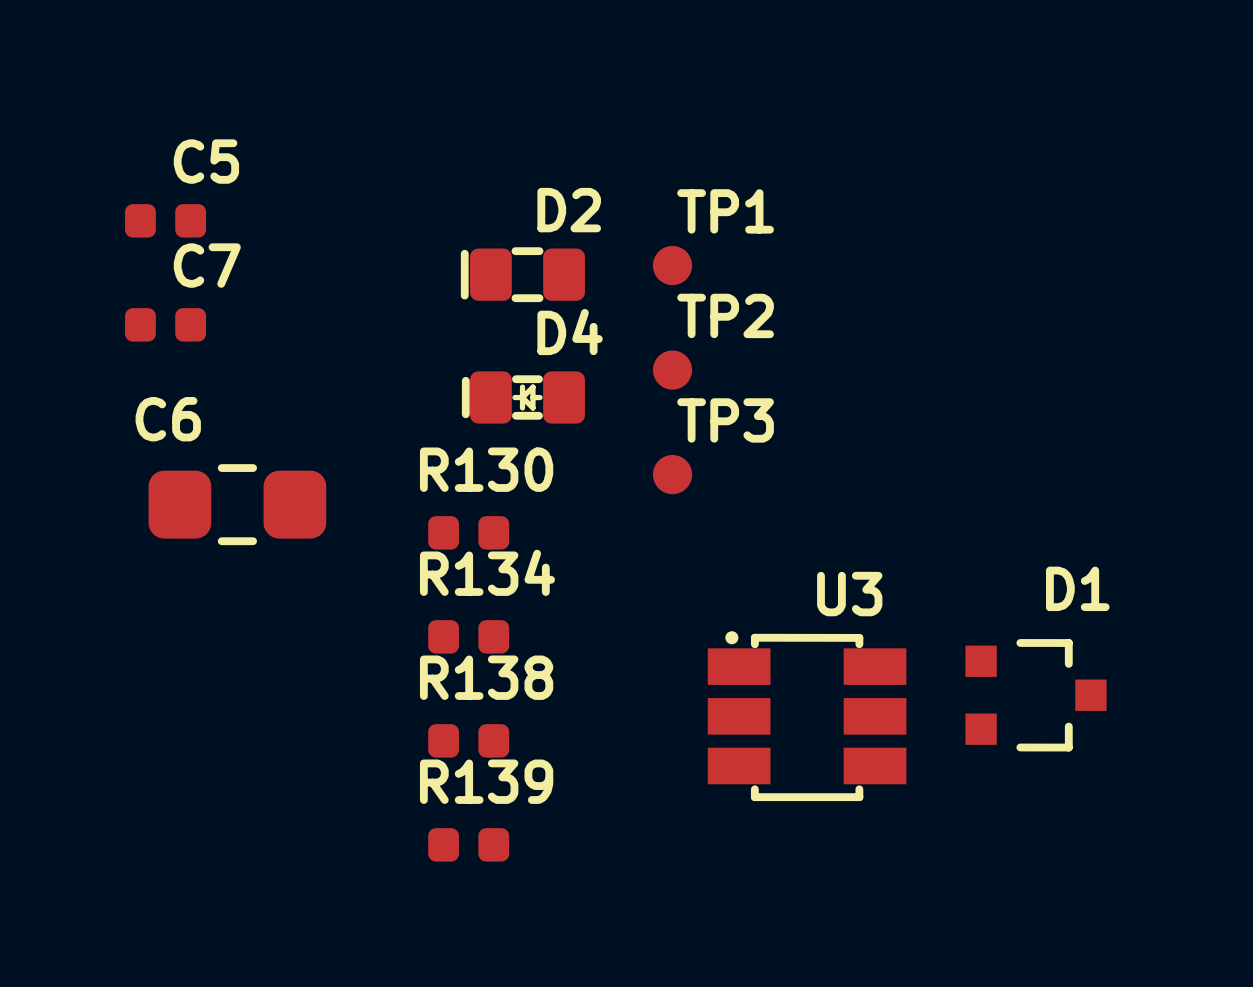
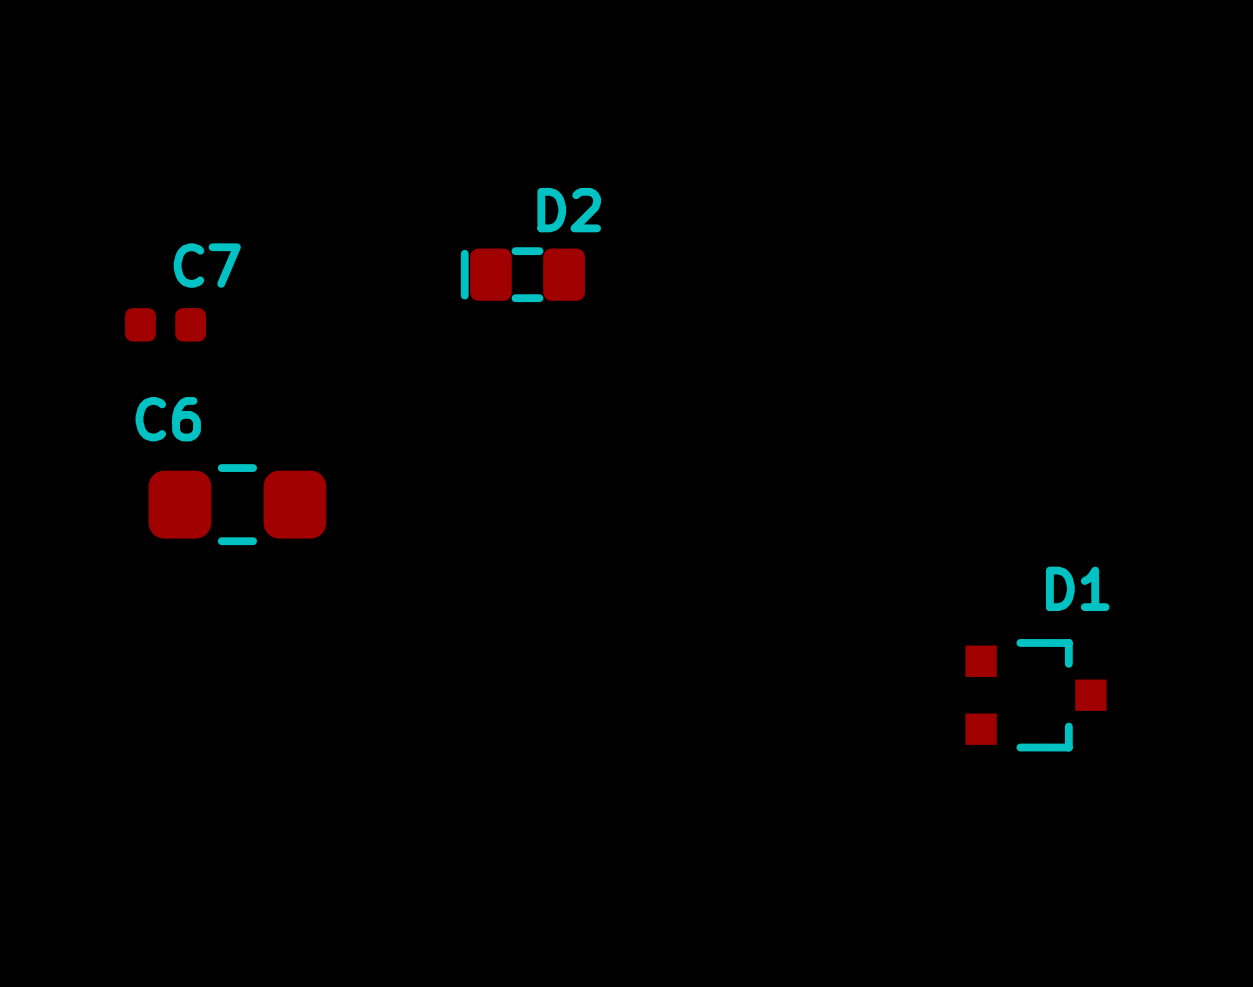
C5: (165, 220) -> none
TP1: (672, 265) -> none
TP2: (672, 370) -> none
D4: (523, 397) -> none
TP3: (672, 474) -> none
R130: (468, 532) -> none
R134: (468, 636) -> none
U3: (807, 716) -> none
R138: (468, 740) -> none
R139: (468, 844) -> none

